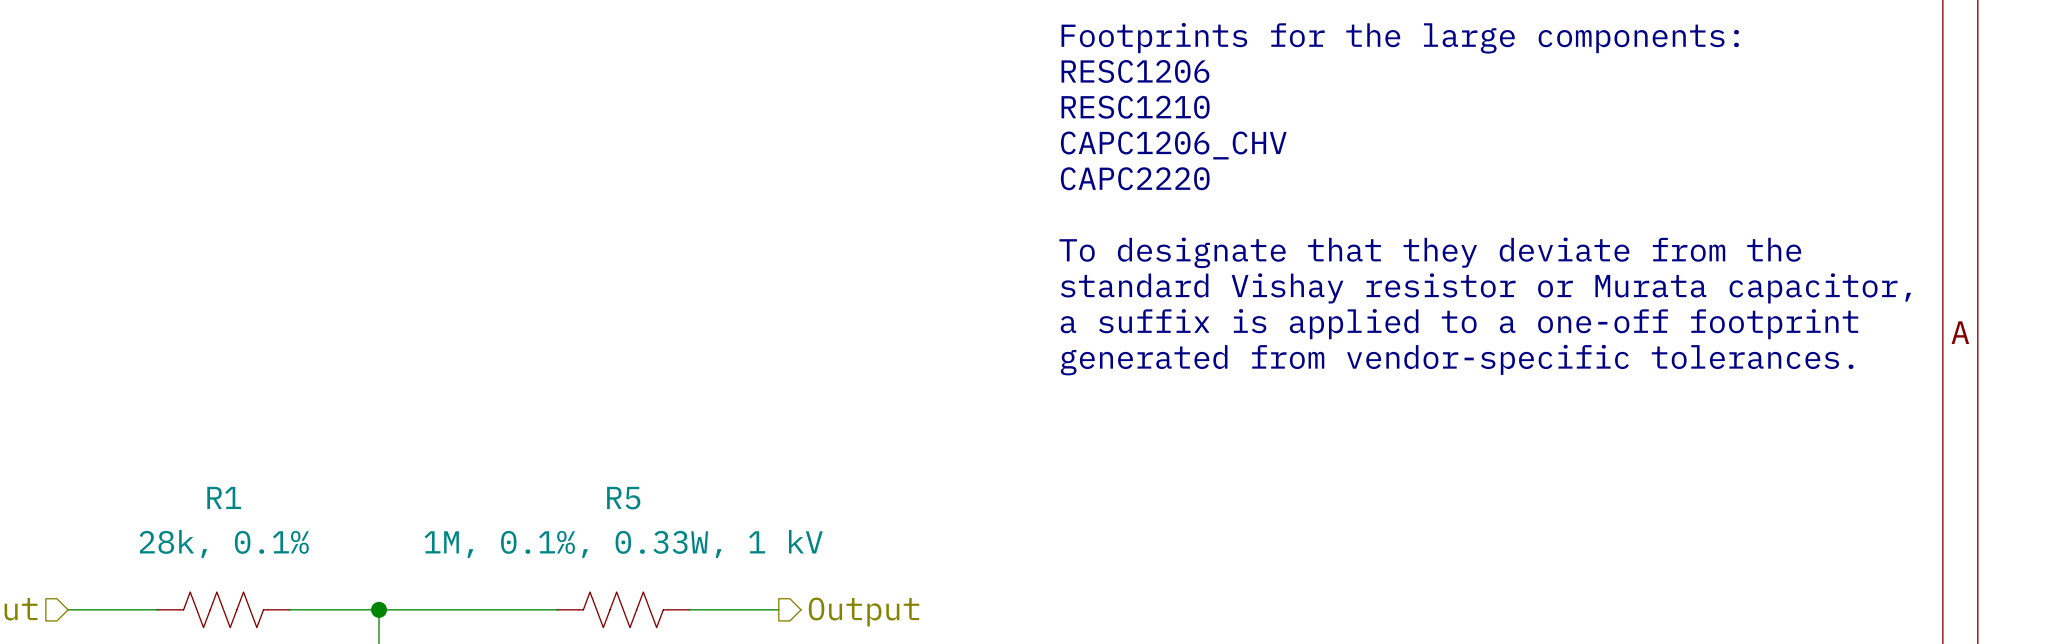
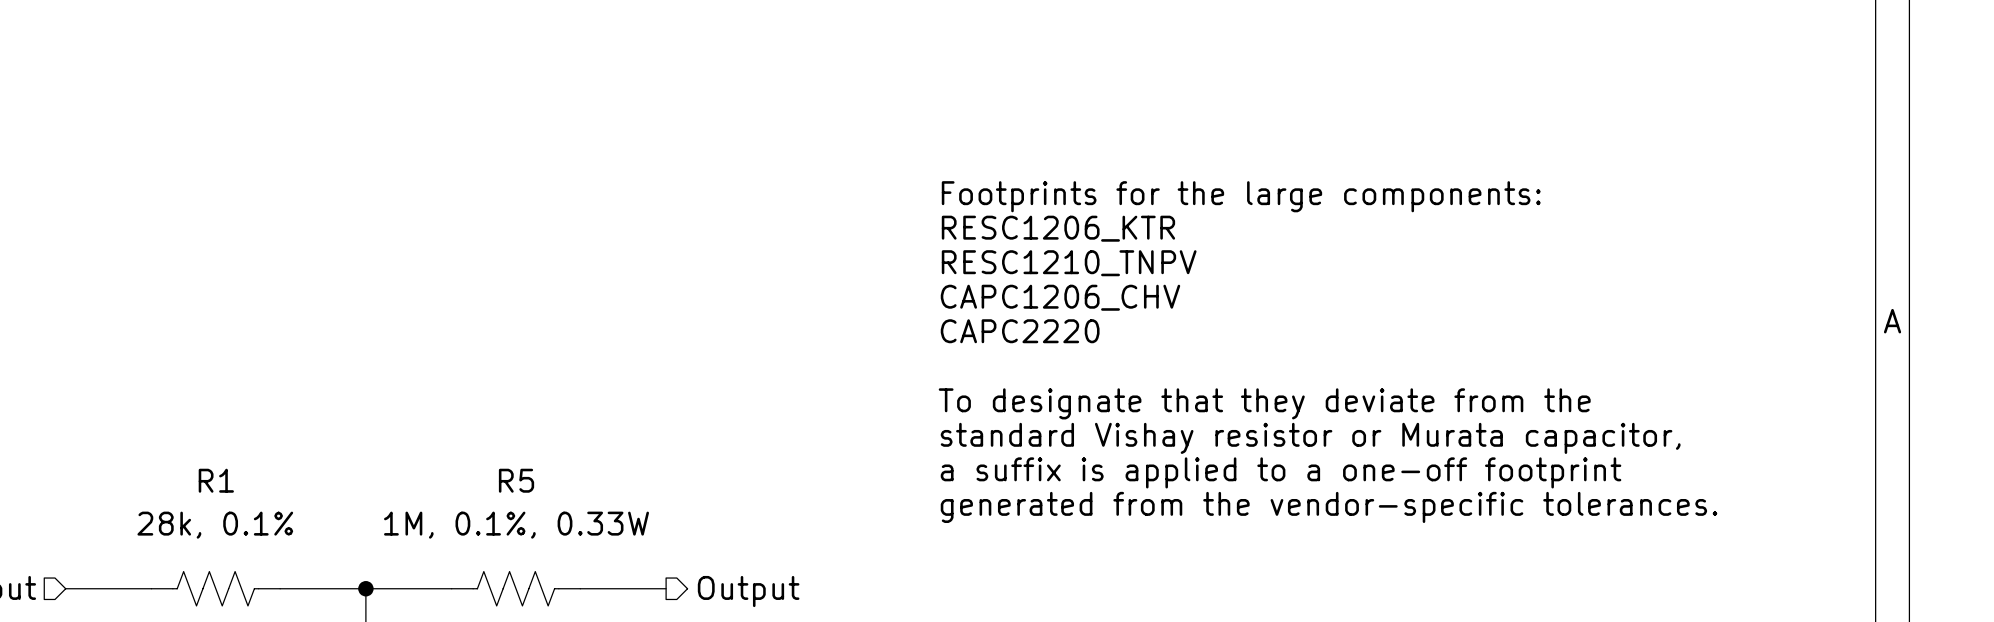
text position: Footprints for the large components: (1400, 38) -> Footprints for the large components: (1241, 196)
text: RESC1206 (1135, 71) -> none
text: RESC1210 (1135, 107) -> none
text position: CAPC1206_CHV (1173, 145) -> CAPC1206_CHV (1060, 297)
text position: CAPC2220 (1135, 178) -> CAPC2220 (1020, 331)
text: none -> RESC1206_KTR (1058, 228)
text position: To designate that they deviate from the (1430, 252) -> To designate that they deviate from the (1264, 403)
text: none -> RESC1210_TNPV (1069, 263)
text position: standard Vishay resistor or Murata capacitor, (1485, 288) -> standard Vishay resistor or Murata capacitor, (1310, 438)
text position: a suffix is applied to a one-off footprint (1459, 324) -> a suffix is applied to a one-off footprint (1281, 472)
text: generated from vendor-specific tolerances. (1457, 360) -> none
text: none -> generated from the vendor-specific tolerances. (1329, 507)
R5 value: 1M, 0.1%, 0.33W, 1 kV (623, 543) -> 1M, 0.1%, 0.33W (516, 525)
wire: (467, 609) (556, 609) -> none
R5 position: (623, 609) -> (516, 588)
wire: (689, 609) (778, 609) -> (666, 588) (580, 588)
hierarchical label position: Output (864, 612) -> Output (748, 591)

